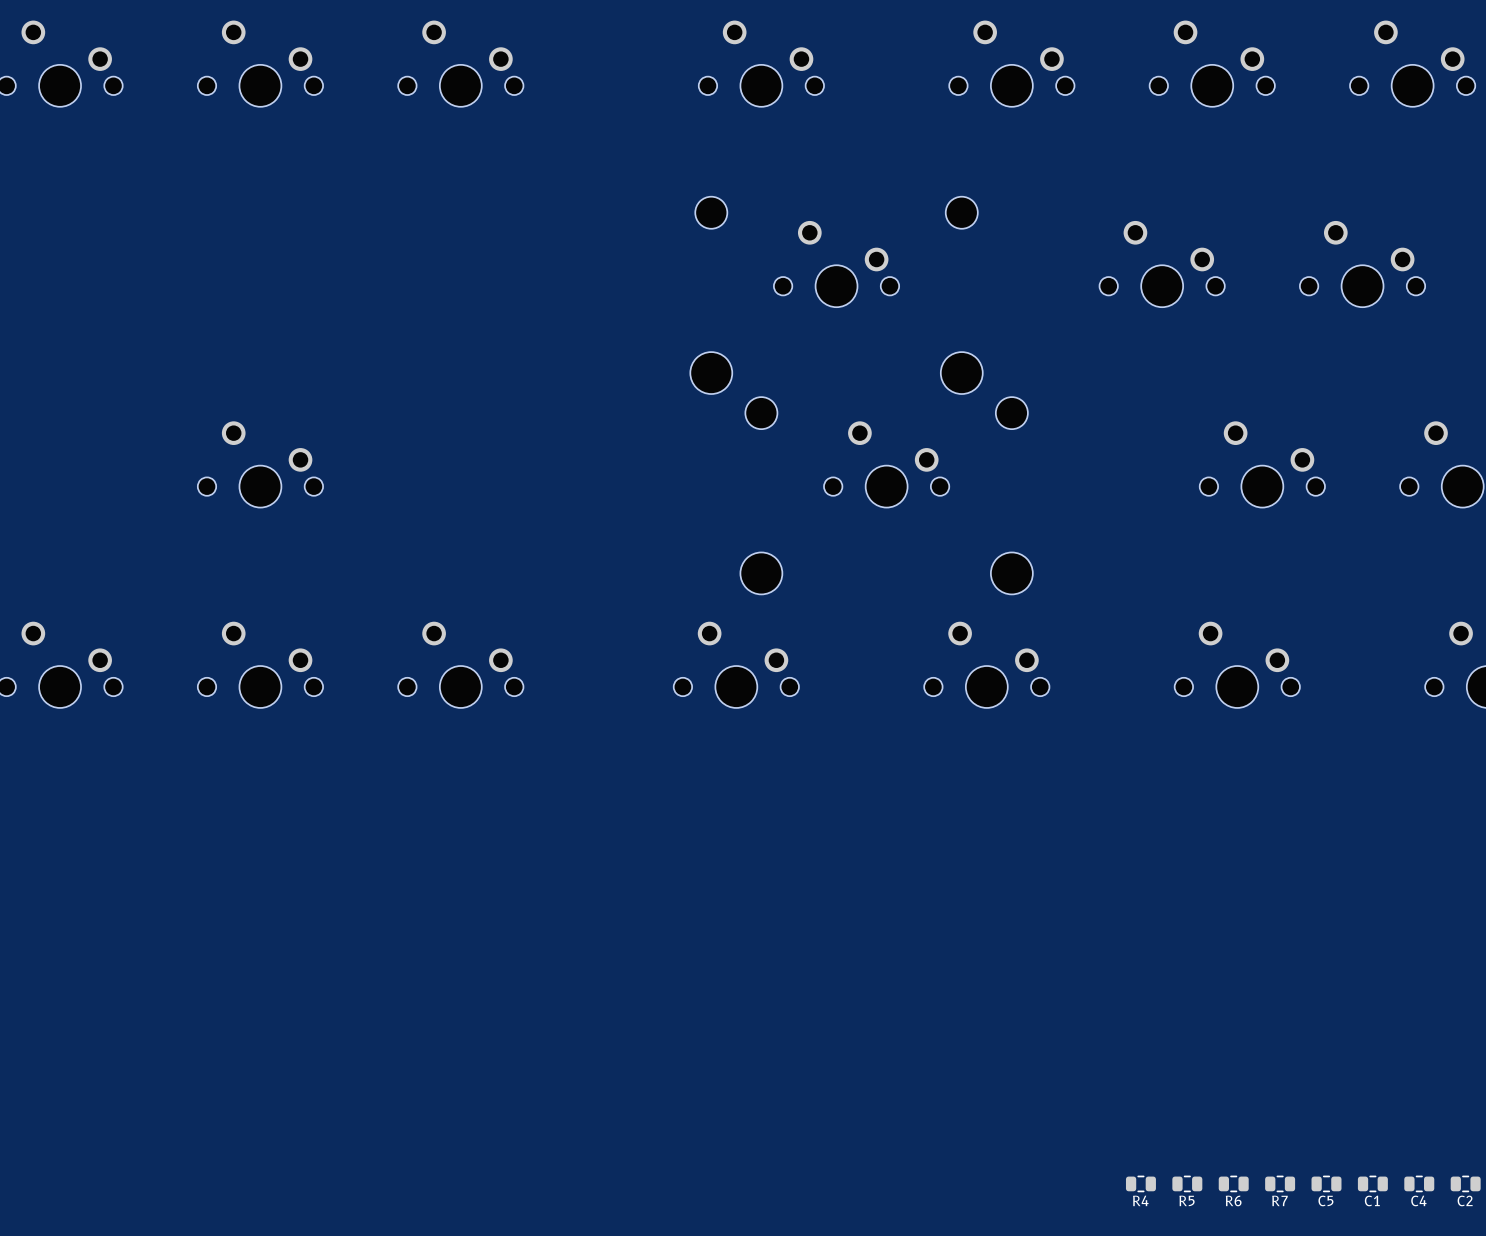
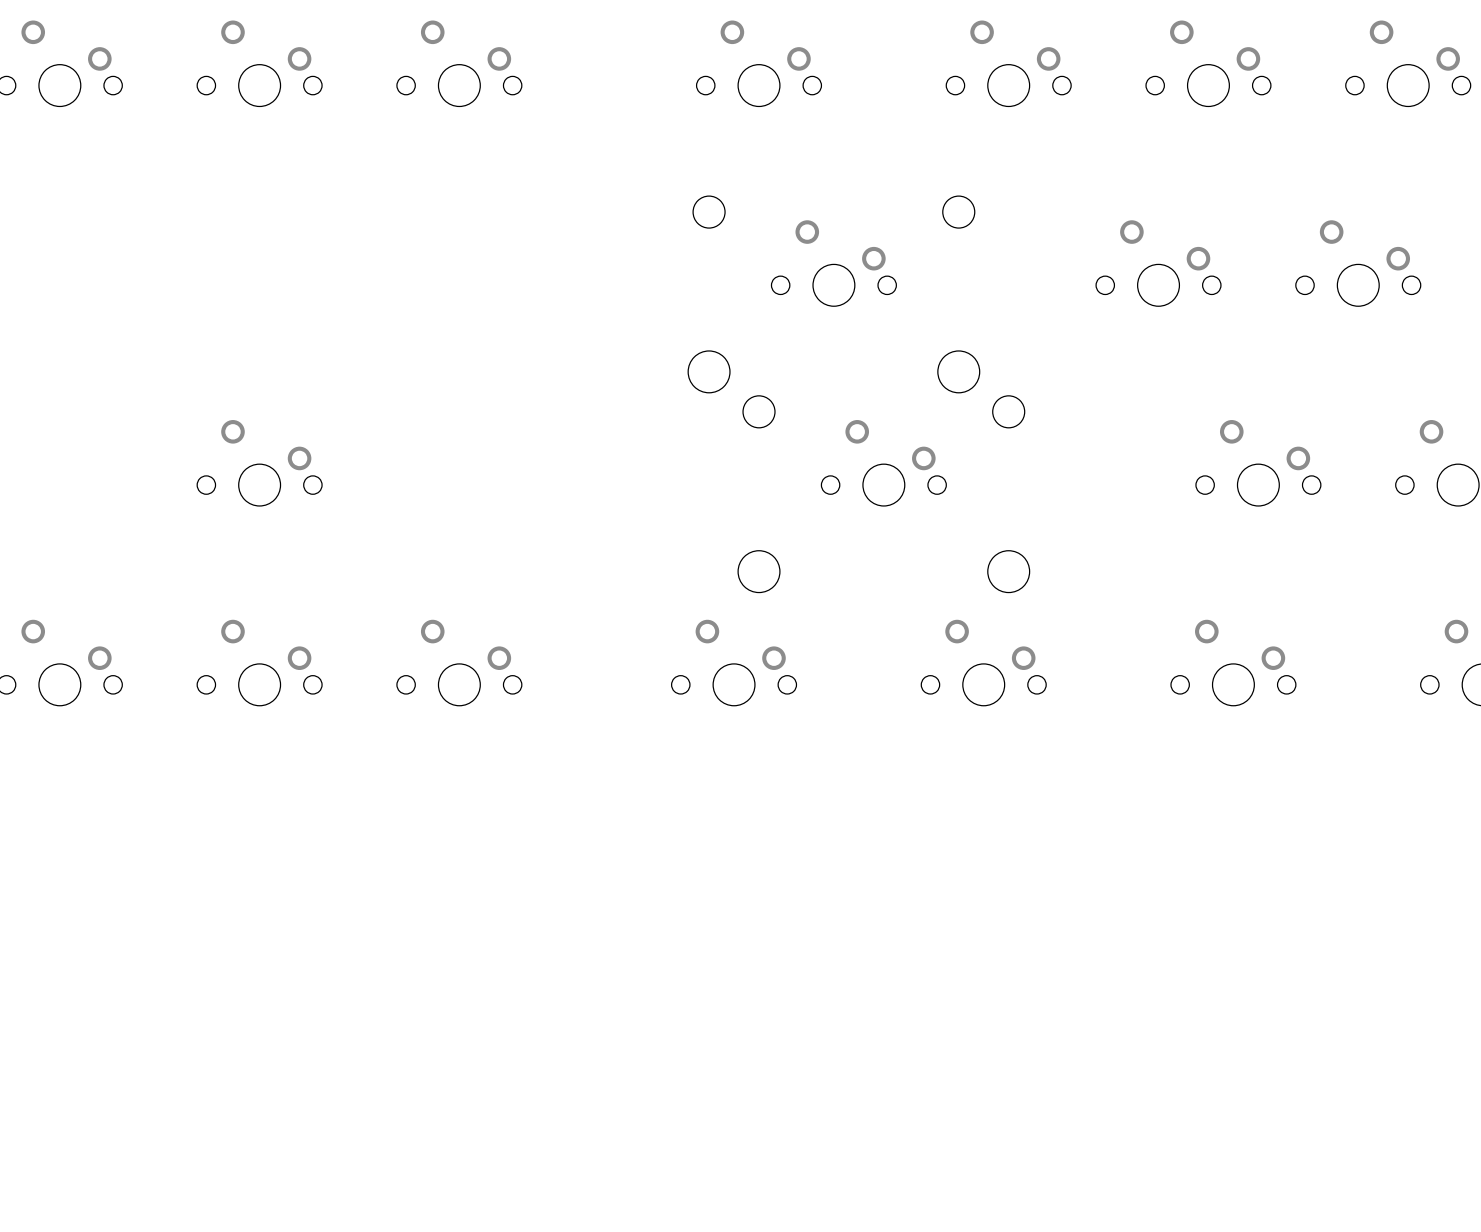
R4: (1140, 1183) -> none
R5: (1187, 1183) -> none
R6: (1233, 1183) -> none
R7: (1280, 1183) -> none
C5: (1326, 1183) -> none
C1: (1372, 1183) -> none
C4: (1419, 1183) -> none
C2: (1465, 1183) -> none

